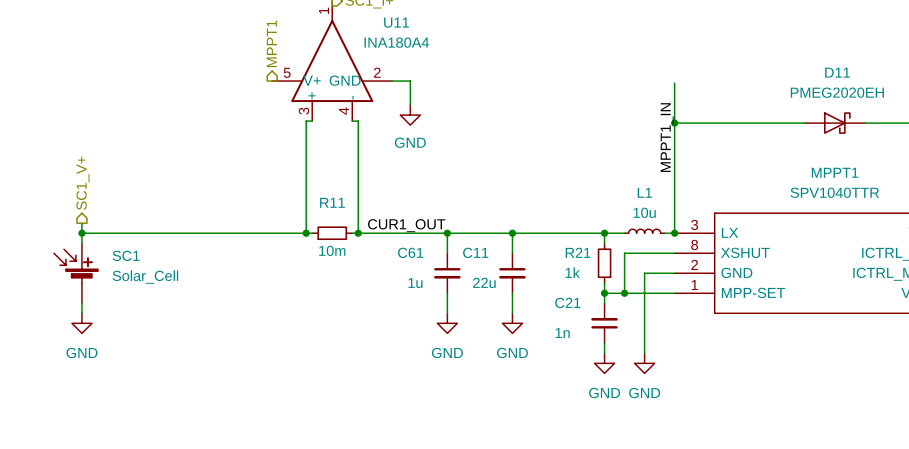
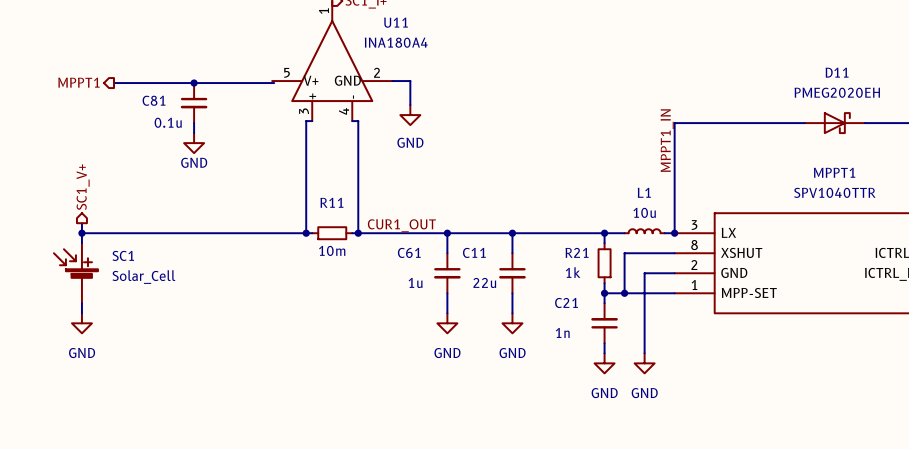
hierarchical label rotation: 0° (271, 43) -> 90° counterclockwise (78, 82)
hierarchical label position: MPPT1 (271, 43) -> MPPT1 (78, 82)
wire: none -> (113, 83) (274, 83)
junction: none -> (194, 83)
wire: (674, 83) (674, 123) -> none
C81: none -> 0.1u (194, 103)
wire: none -> (194, 123) (194, 133)
junction: (674, 123) -> none
power symbol: none -> GND (194, 143)

